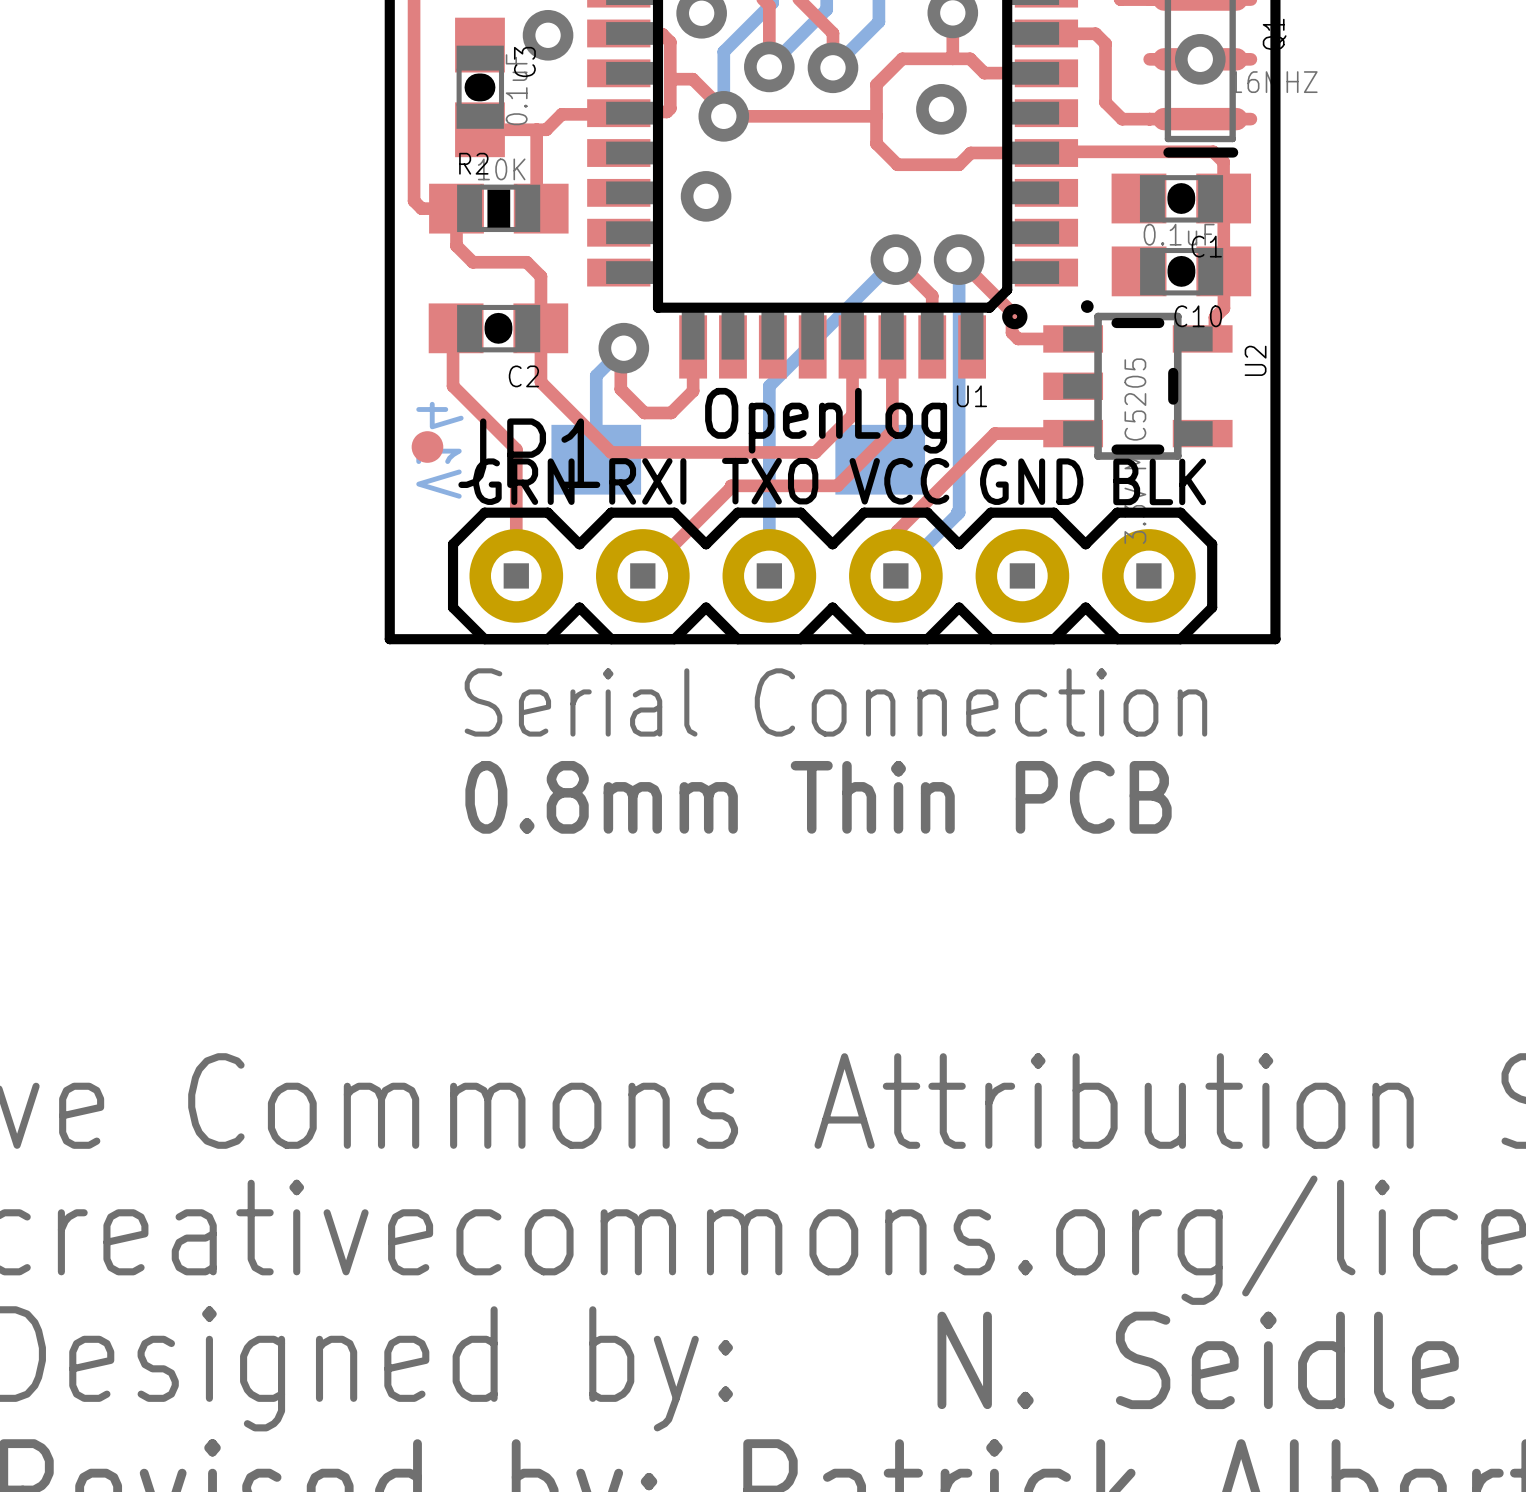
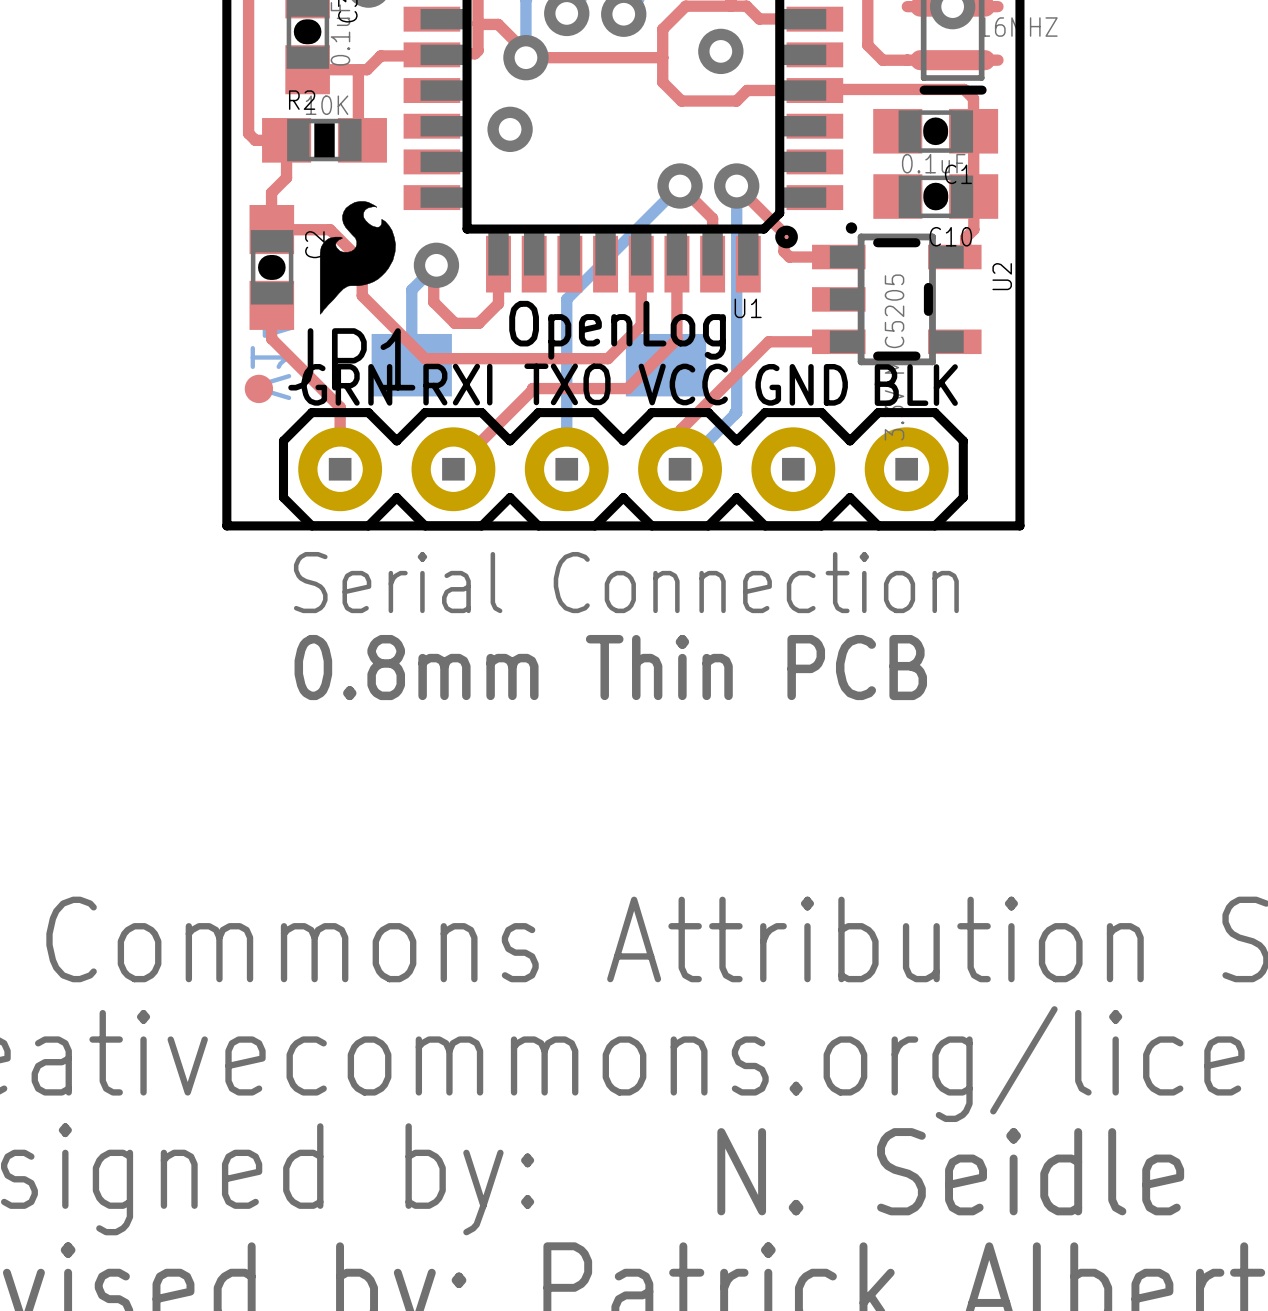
top track: (456, 245) (472, 262) (526, 262) (540, 276) (540, 344) -> (272, 229) (330, 229) (362, 261)
top track: none -> (286, 173) (286, 177) (271, 192) (271, 229)
drawing: none -> [319, 201, 396, 315]
top track: (456, 328) (453, 331) (453, 386) (516, 449) (516, 506) -> (271, 305) (271, 338) (340, 407)
C2 rotation: 0° (498, 328) -> 90° clockwise (271, 267)
part position: (427, 447) -> (258, 388)

